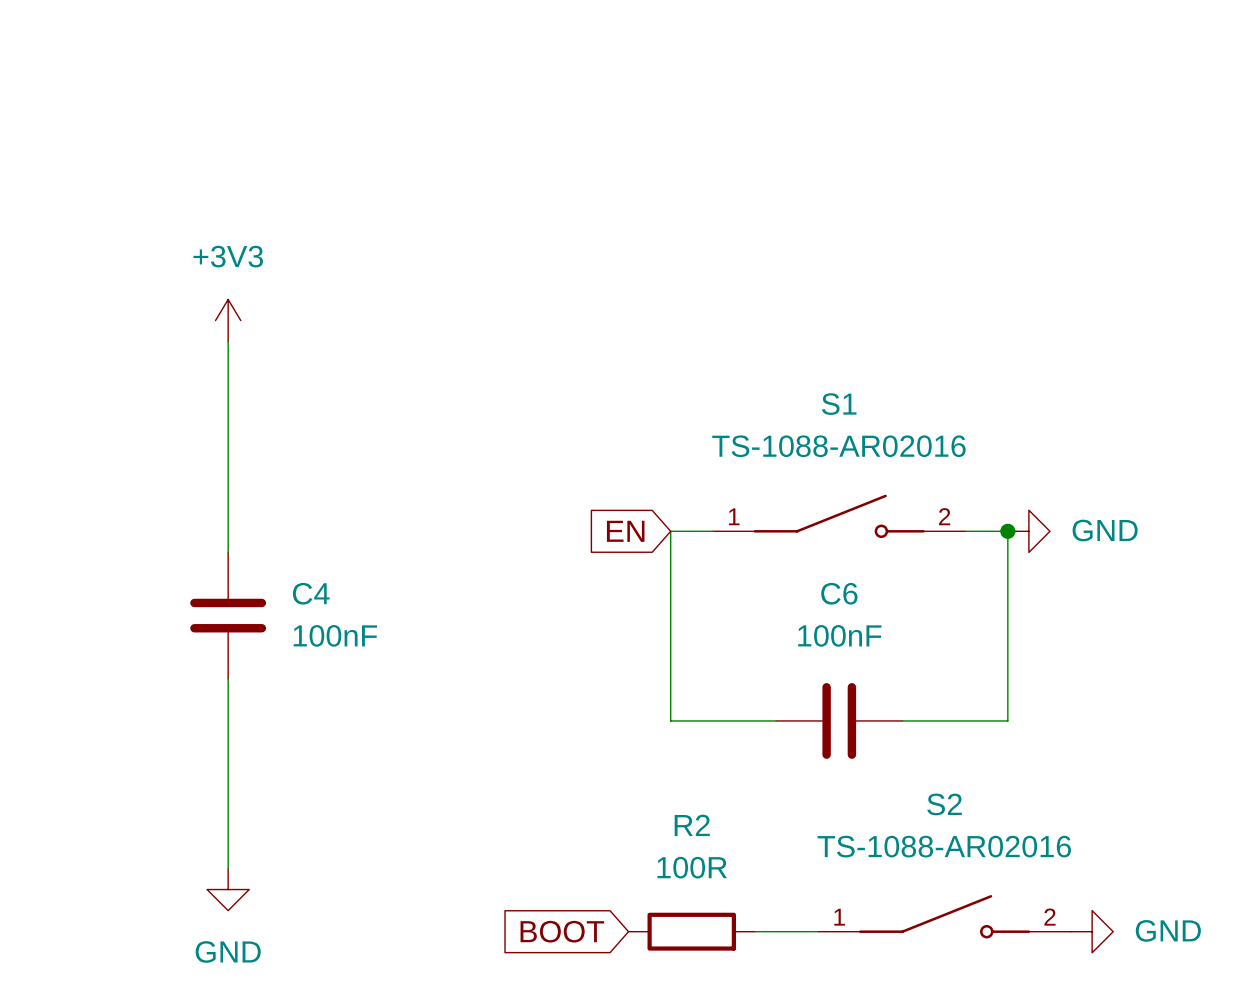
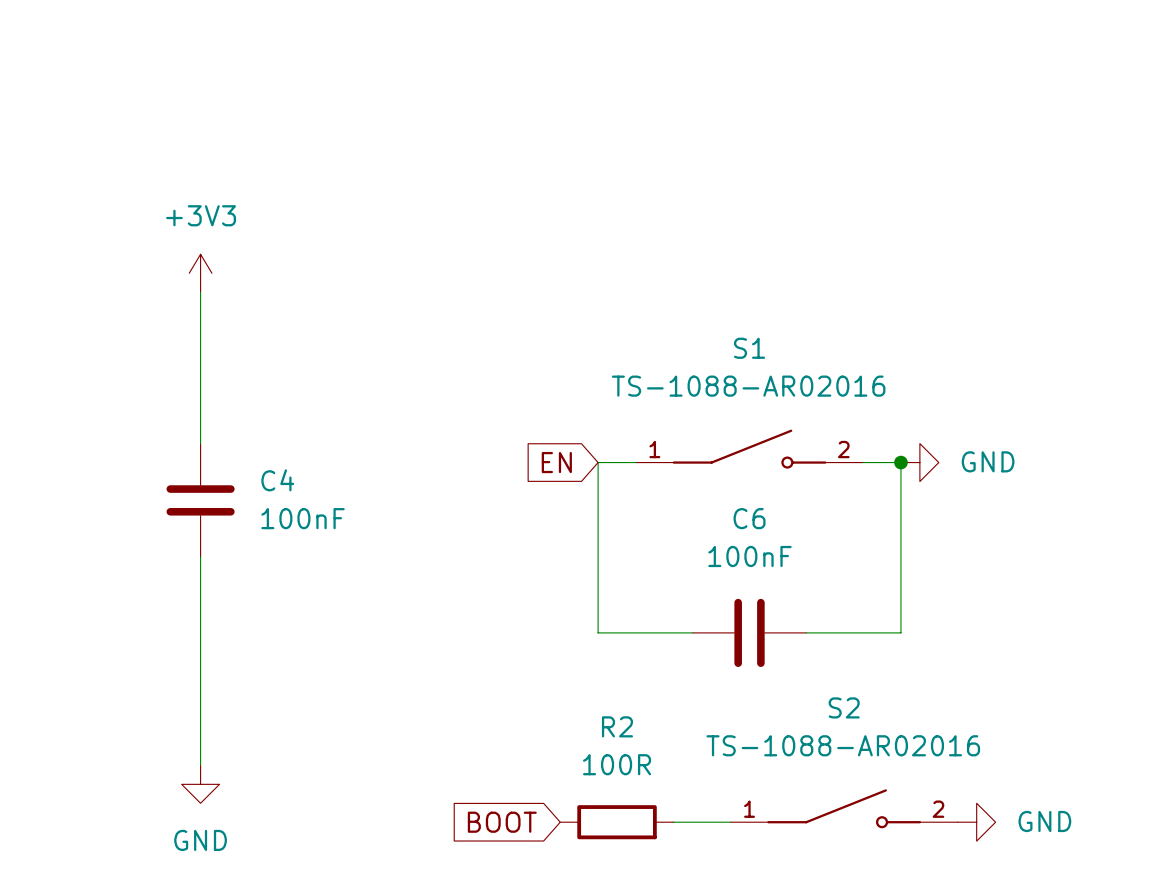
C4 position: (228, 615) -> (200, 500)

